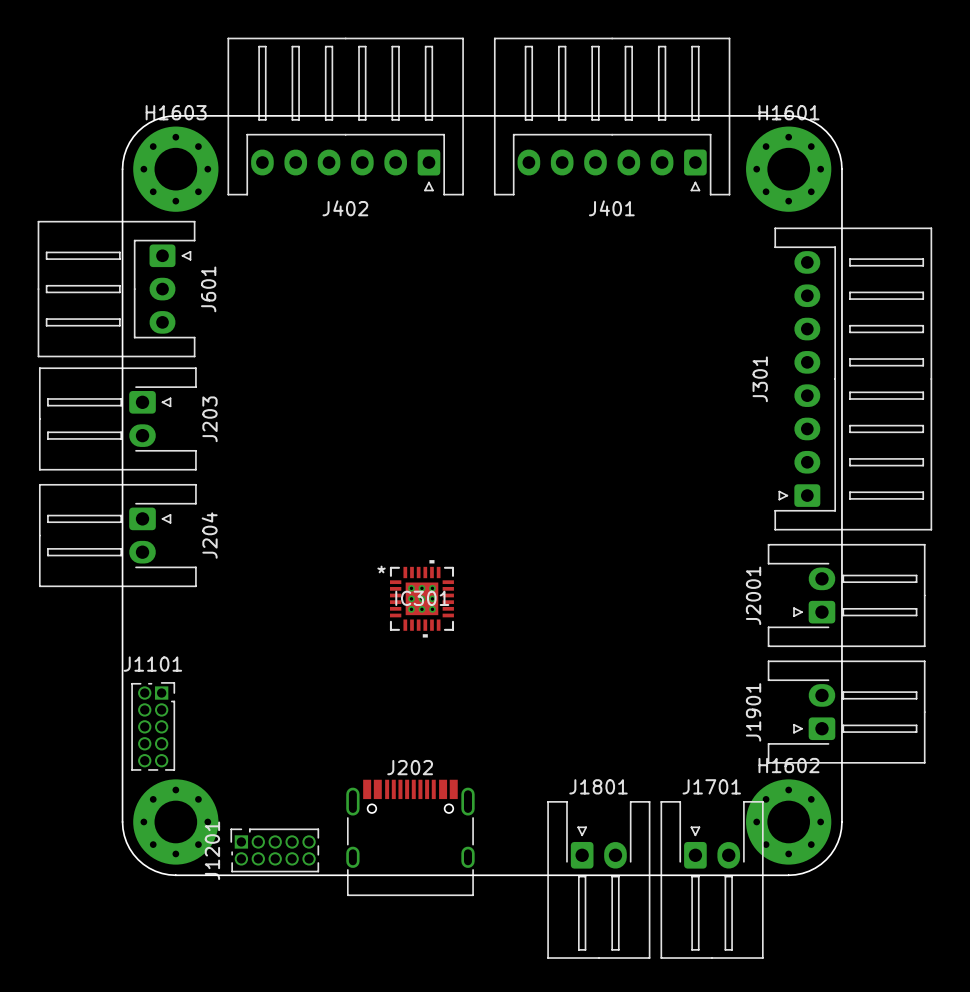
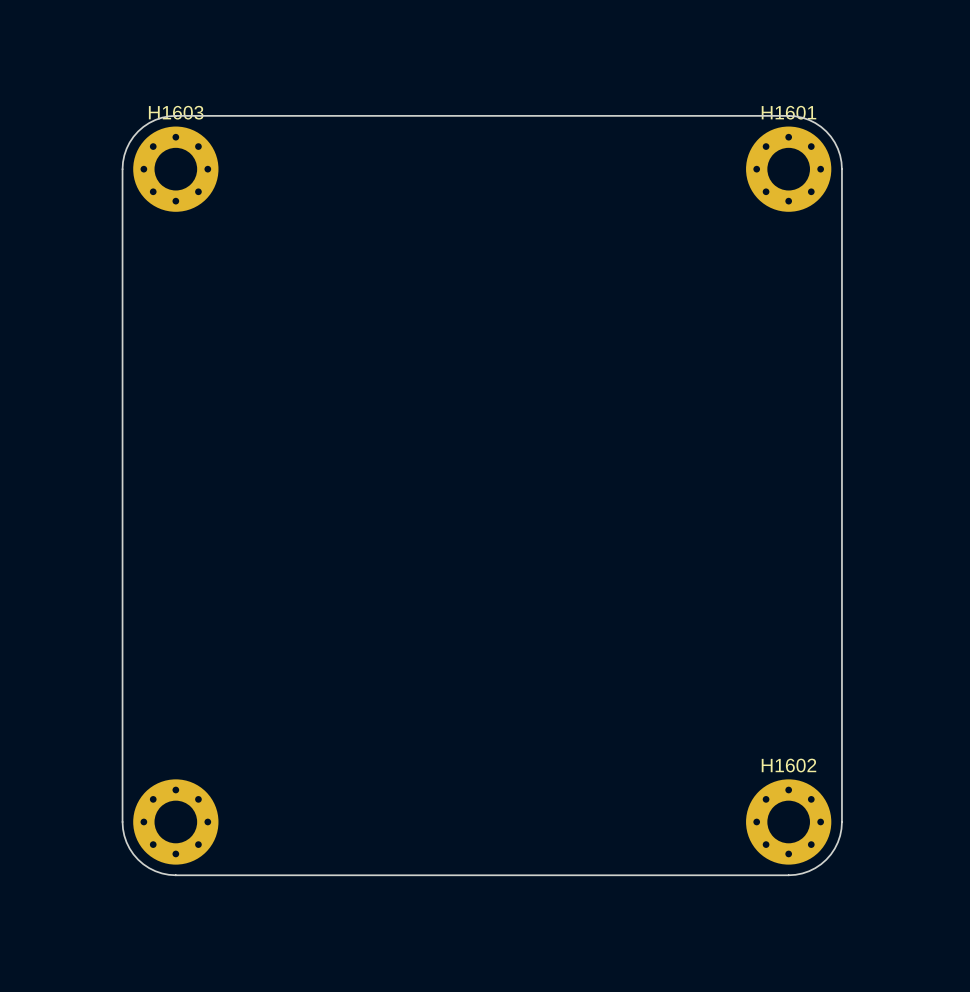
J402: (345, 116) -> none
J401: (612, 116) -> none
J601: (116, 289) -> none
J301: (853, 379) -> none
J203: (117, 418) -> none
J204: (117, 535) -> none
J2001: (846, 595) -> none
IC301: (421, 598) -> none
J1901: (846, 712) -> none
J1101: (153, 726) -> none
J202: (410, 837) -> none
J1201: (274, 850) -> none
J1801: (598, 879) -> none
J1701: (712, 879) -> none

